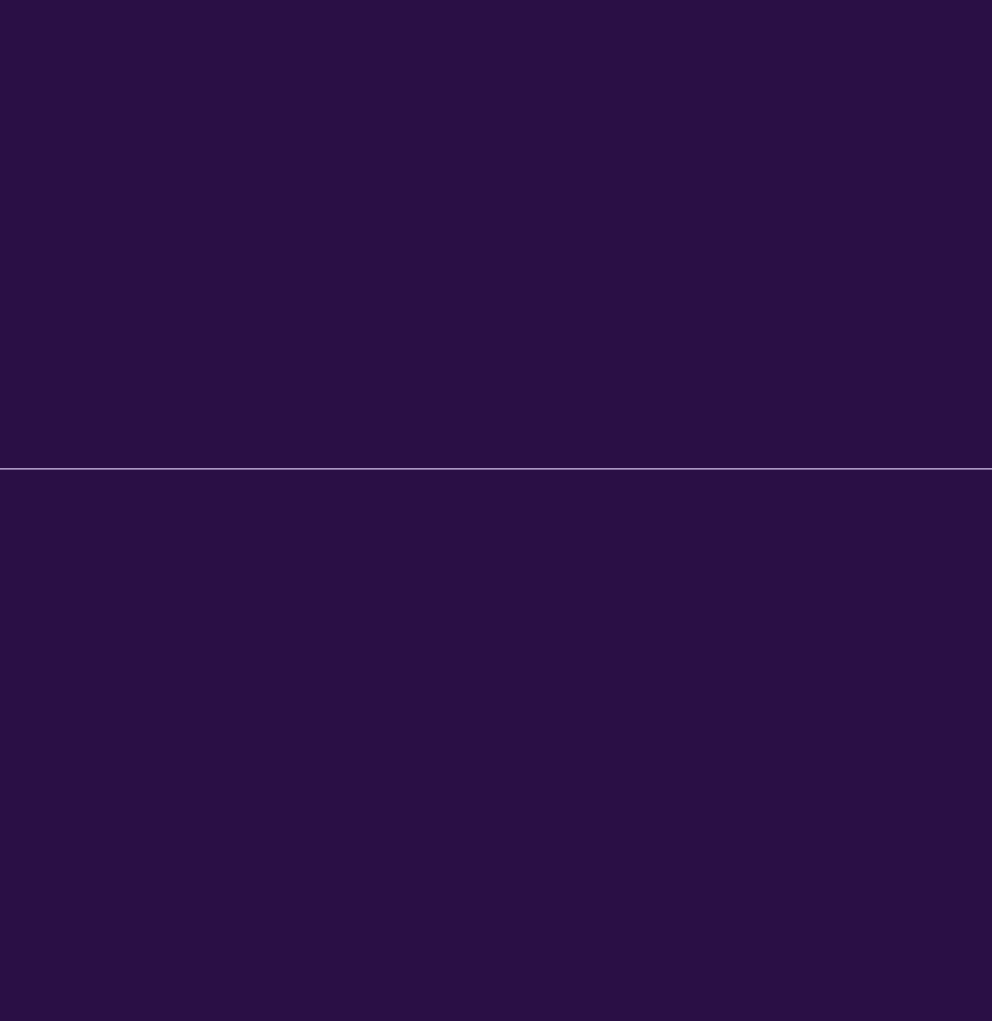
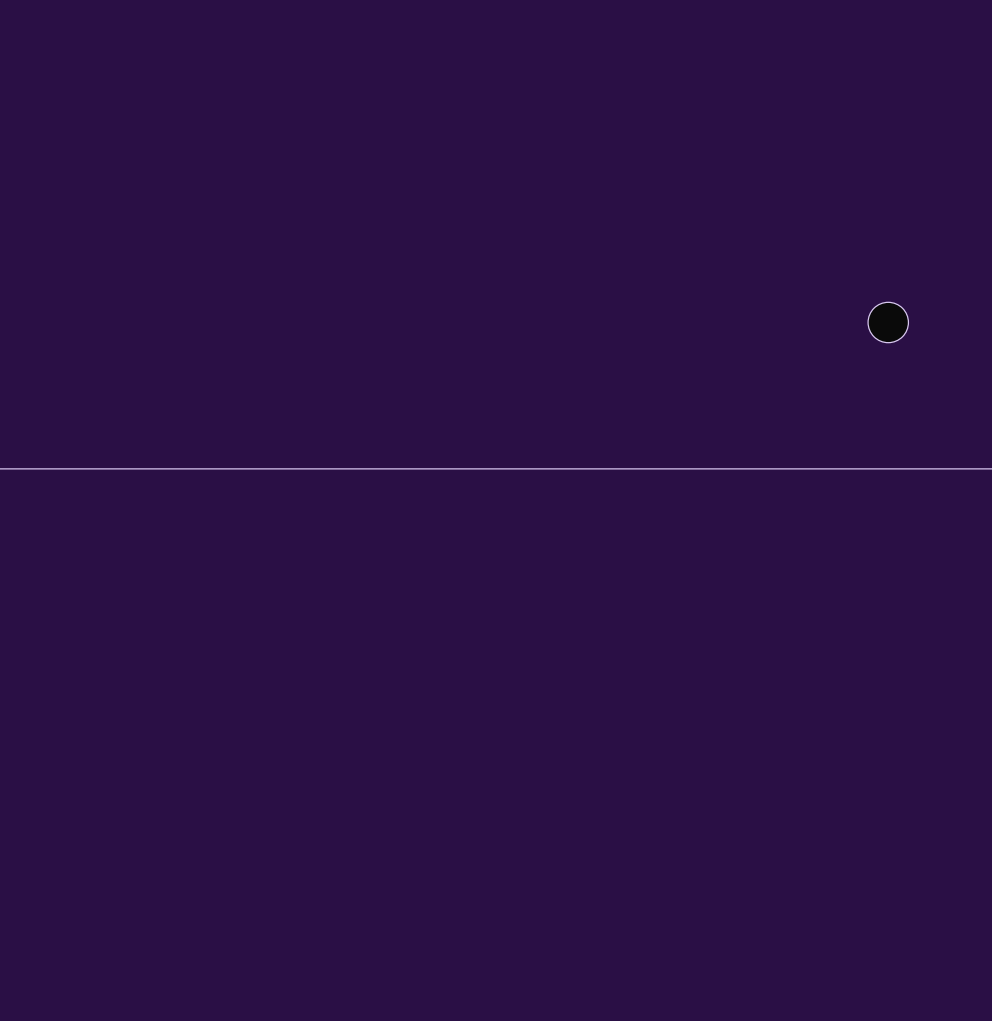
hole: none -> (888, 322)

